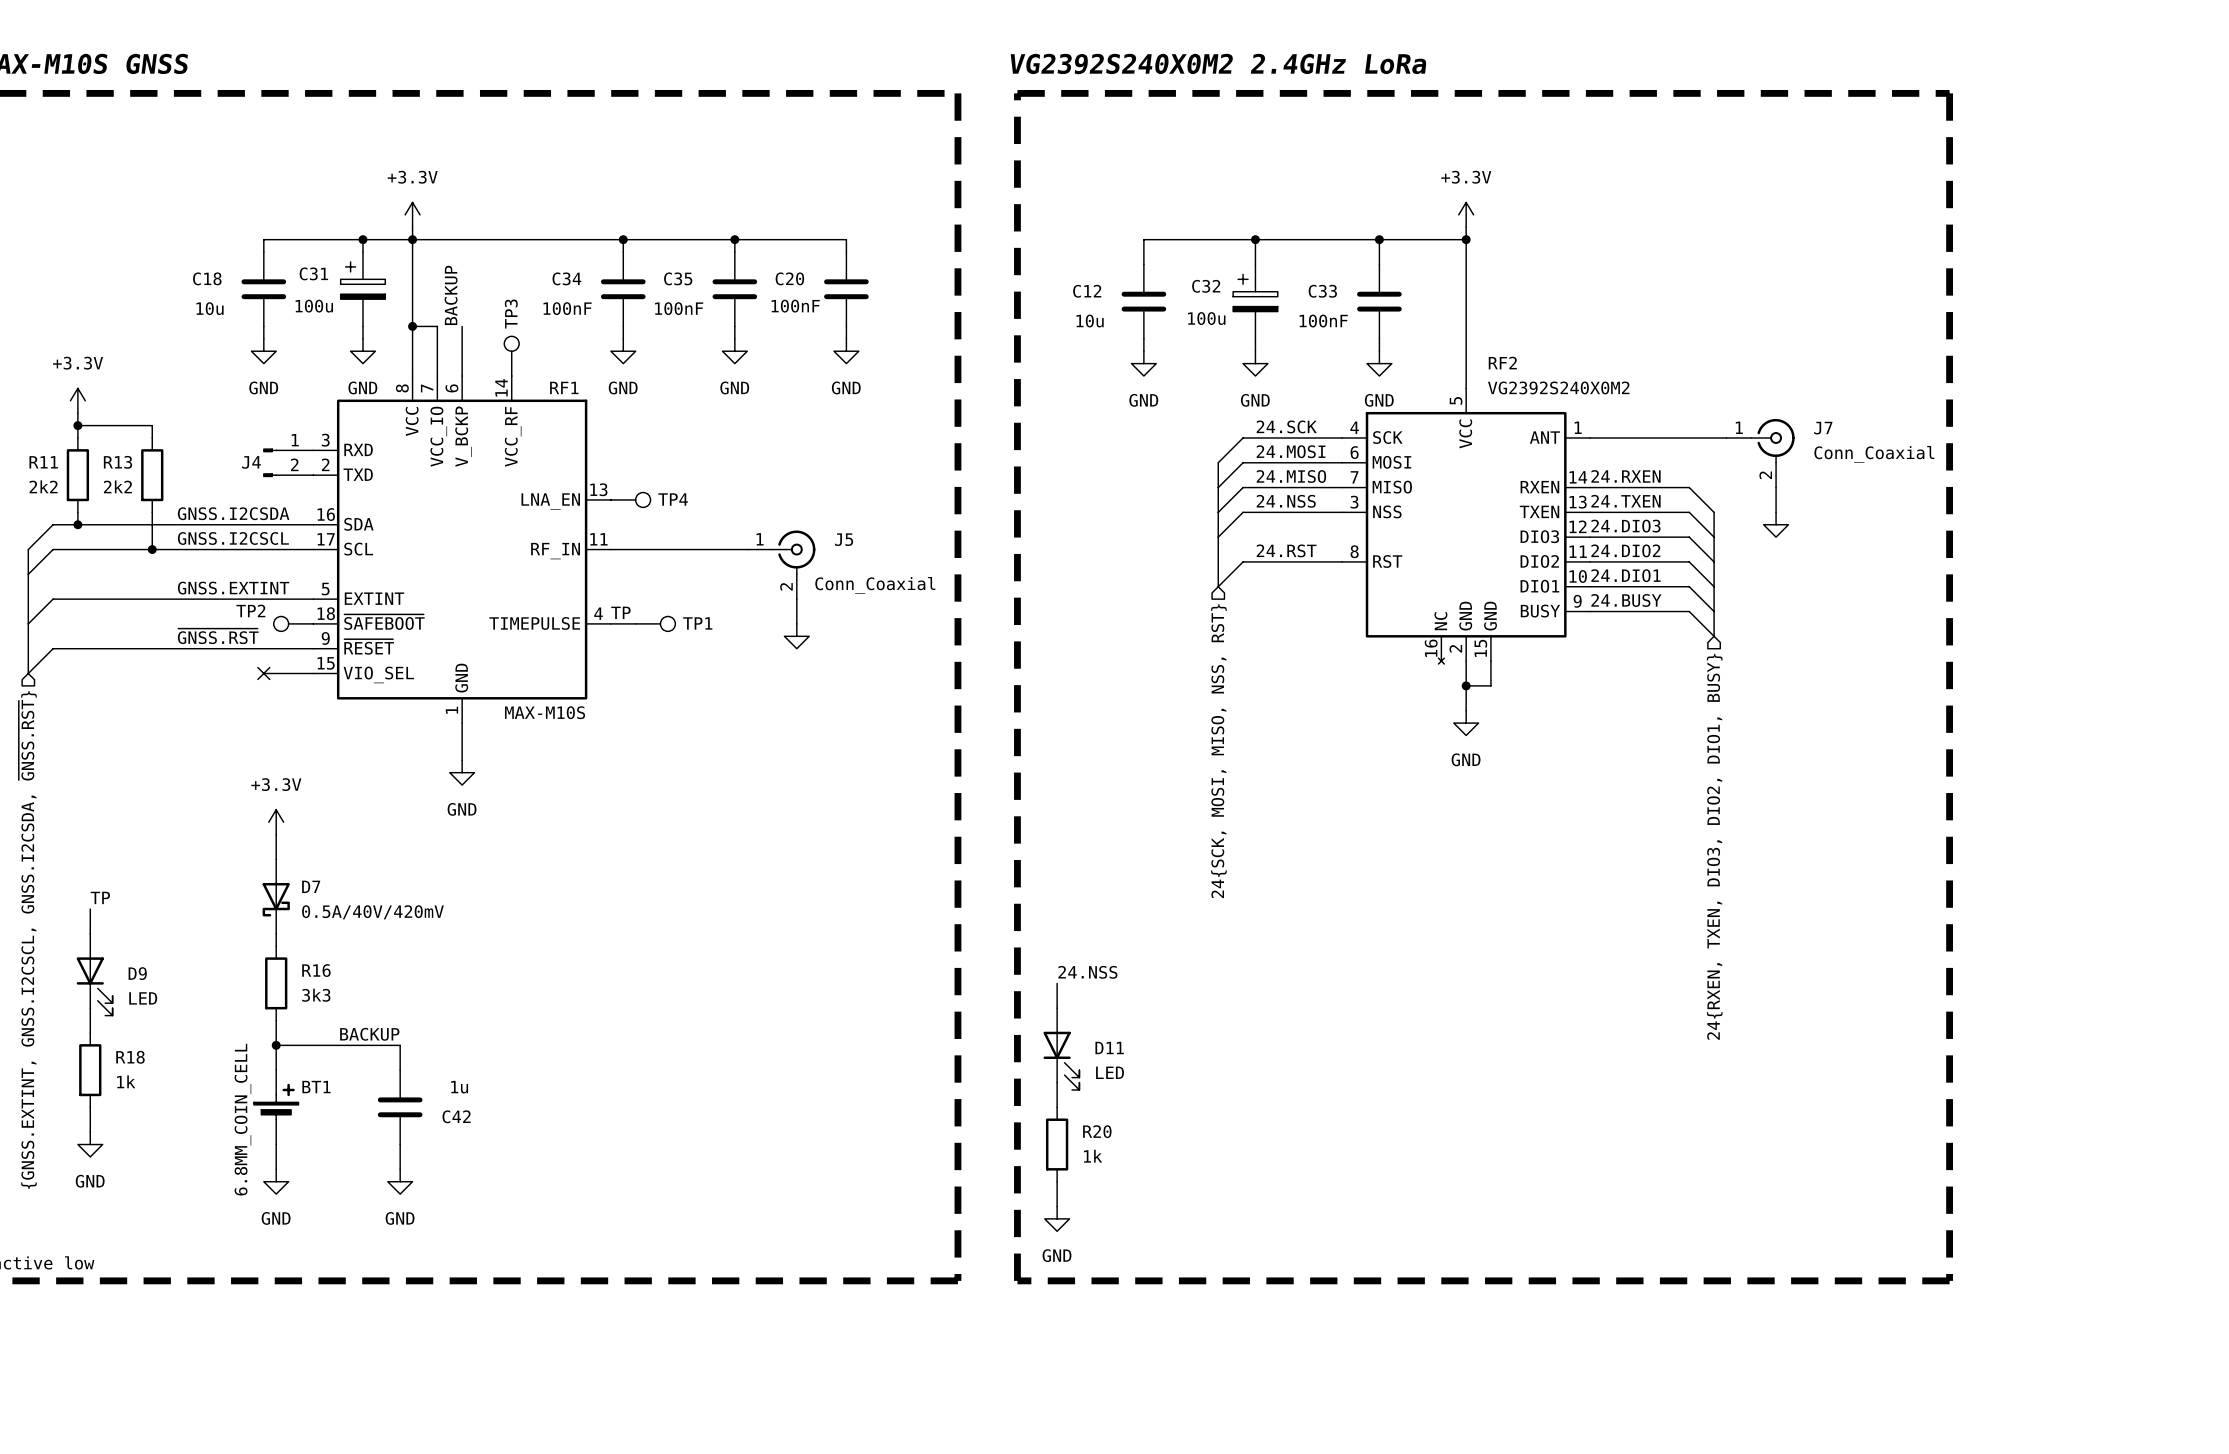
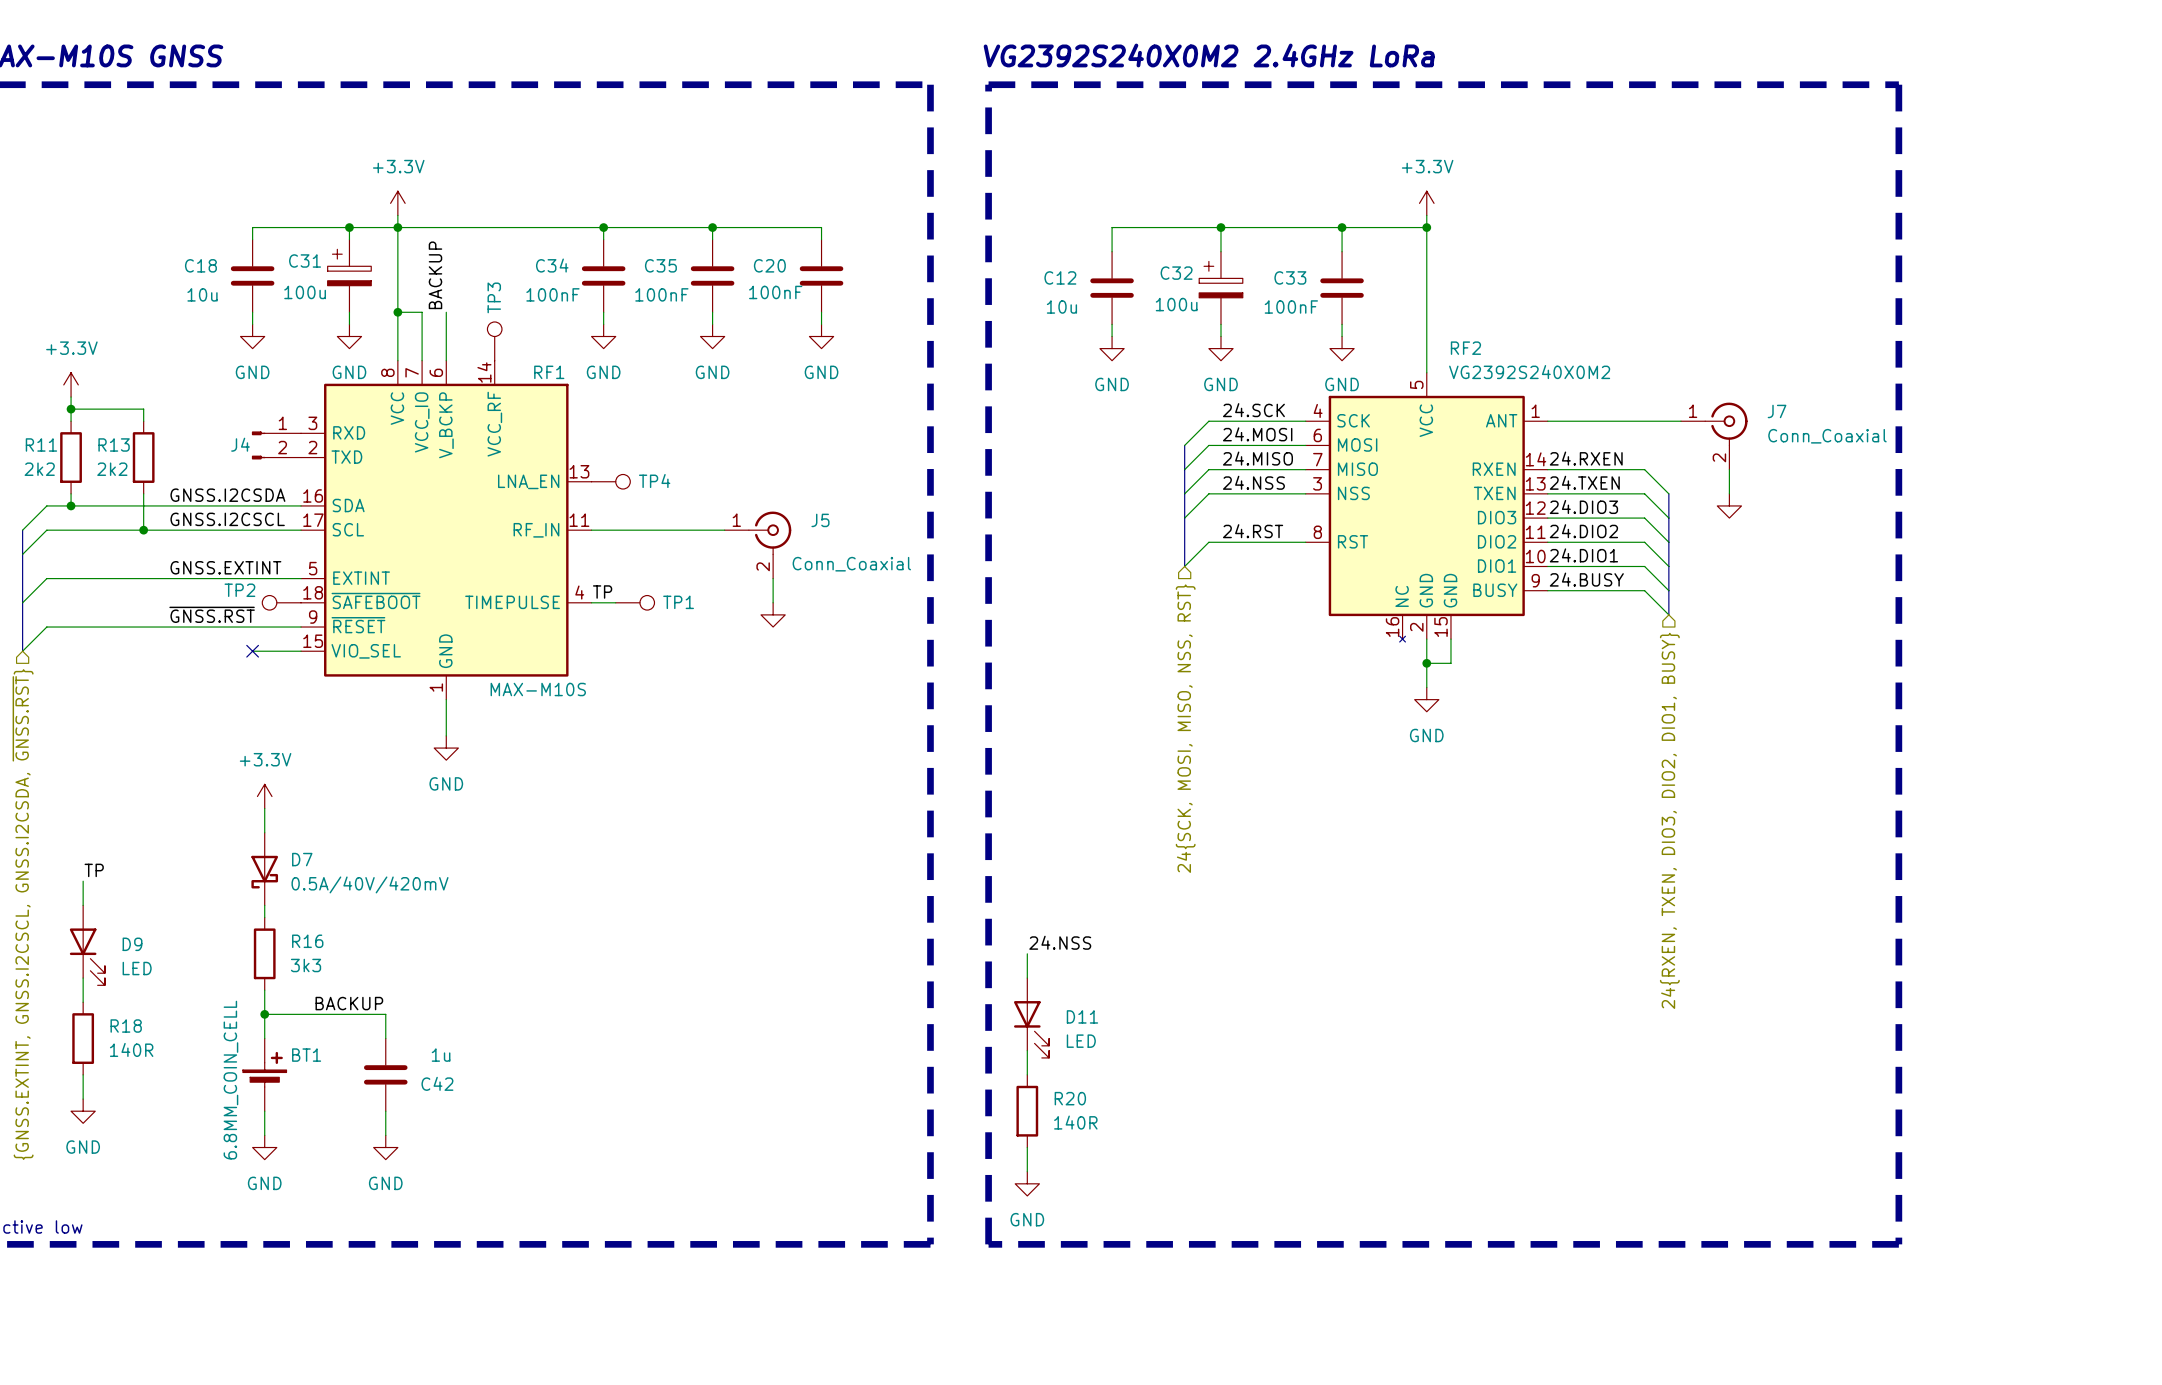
R18 value: 1k (126, 1081) -> 140R (131, 1049)
R20 value: 1k (1093, 1156) -> 140R (1075, 1122)

